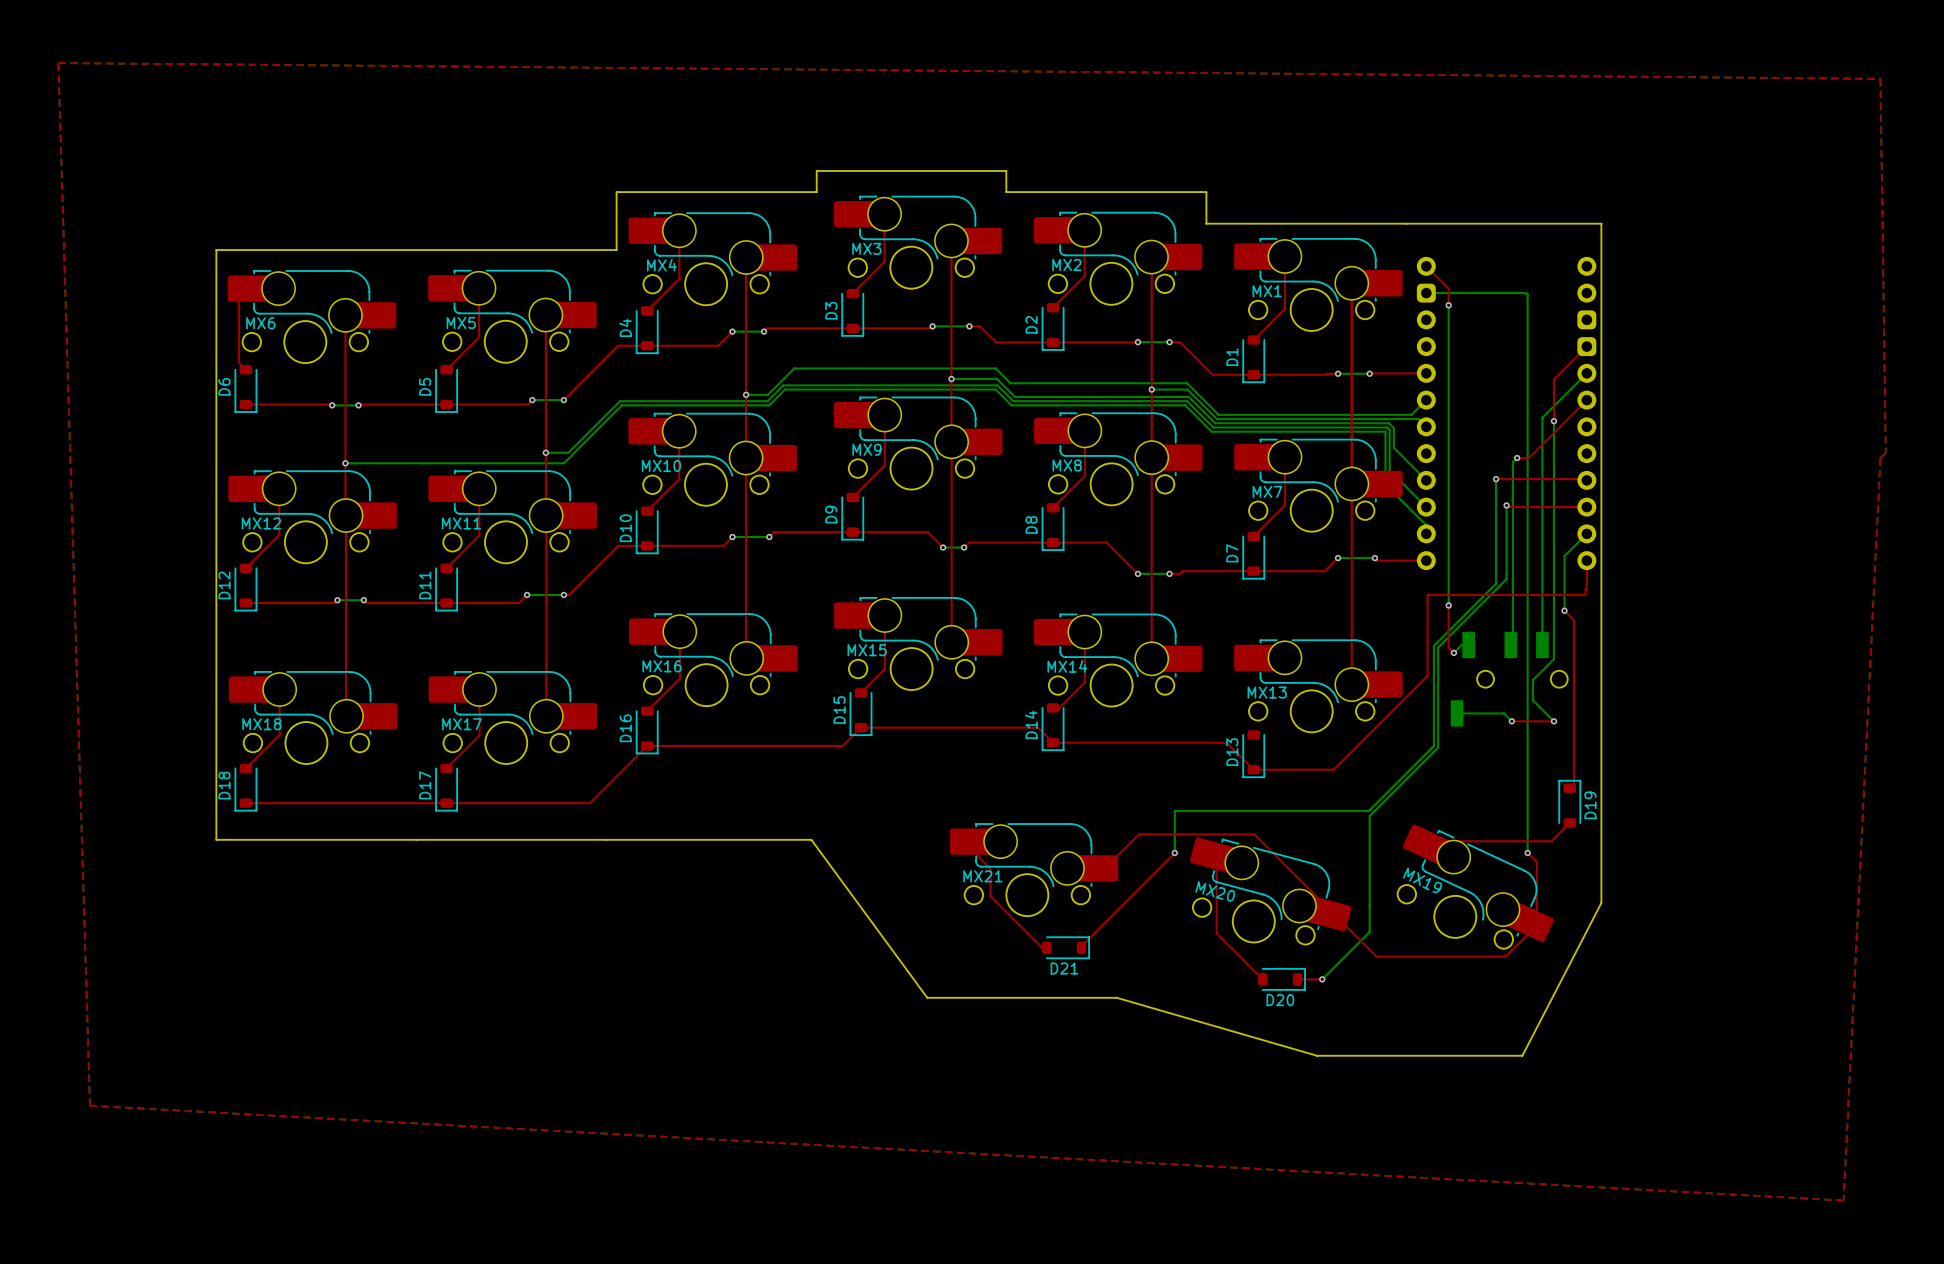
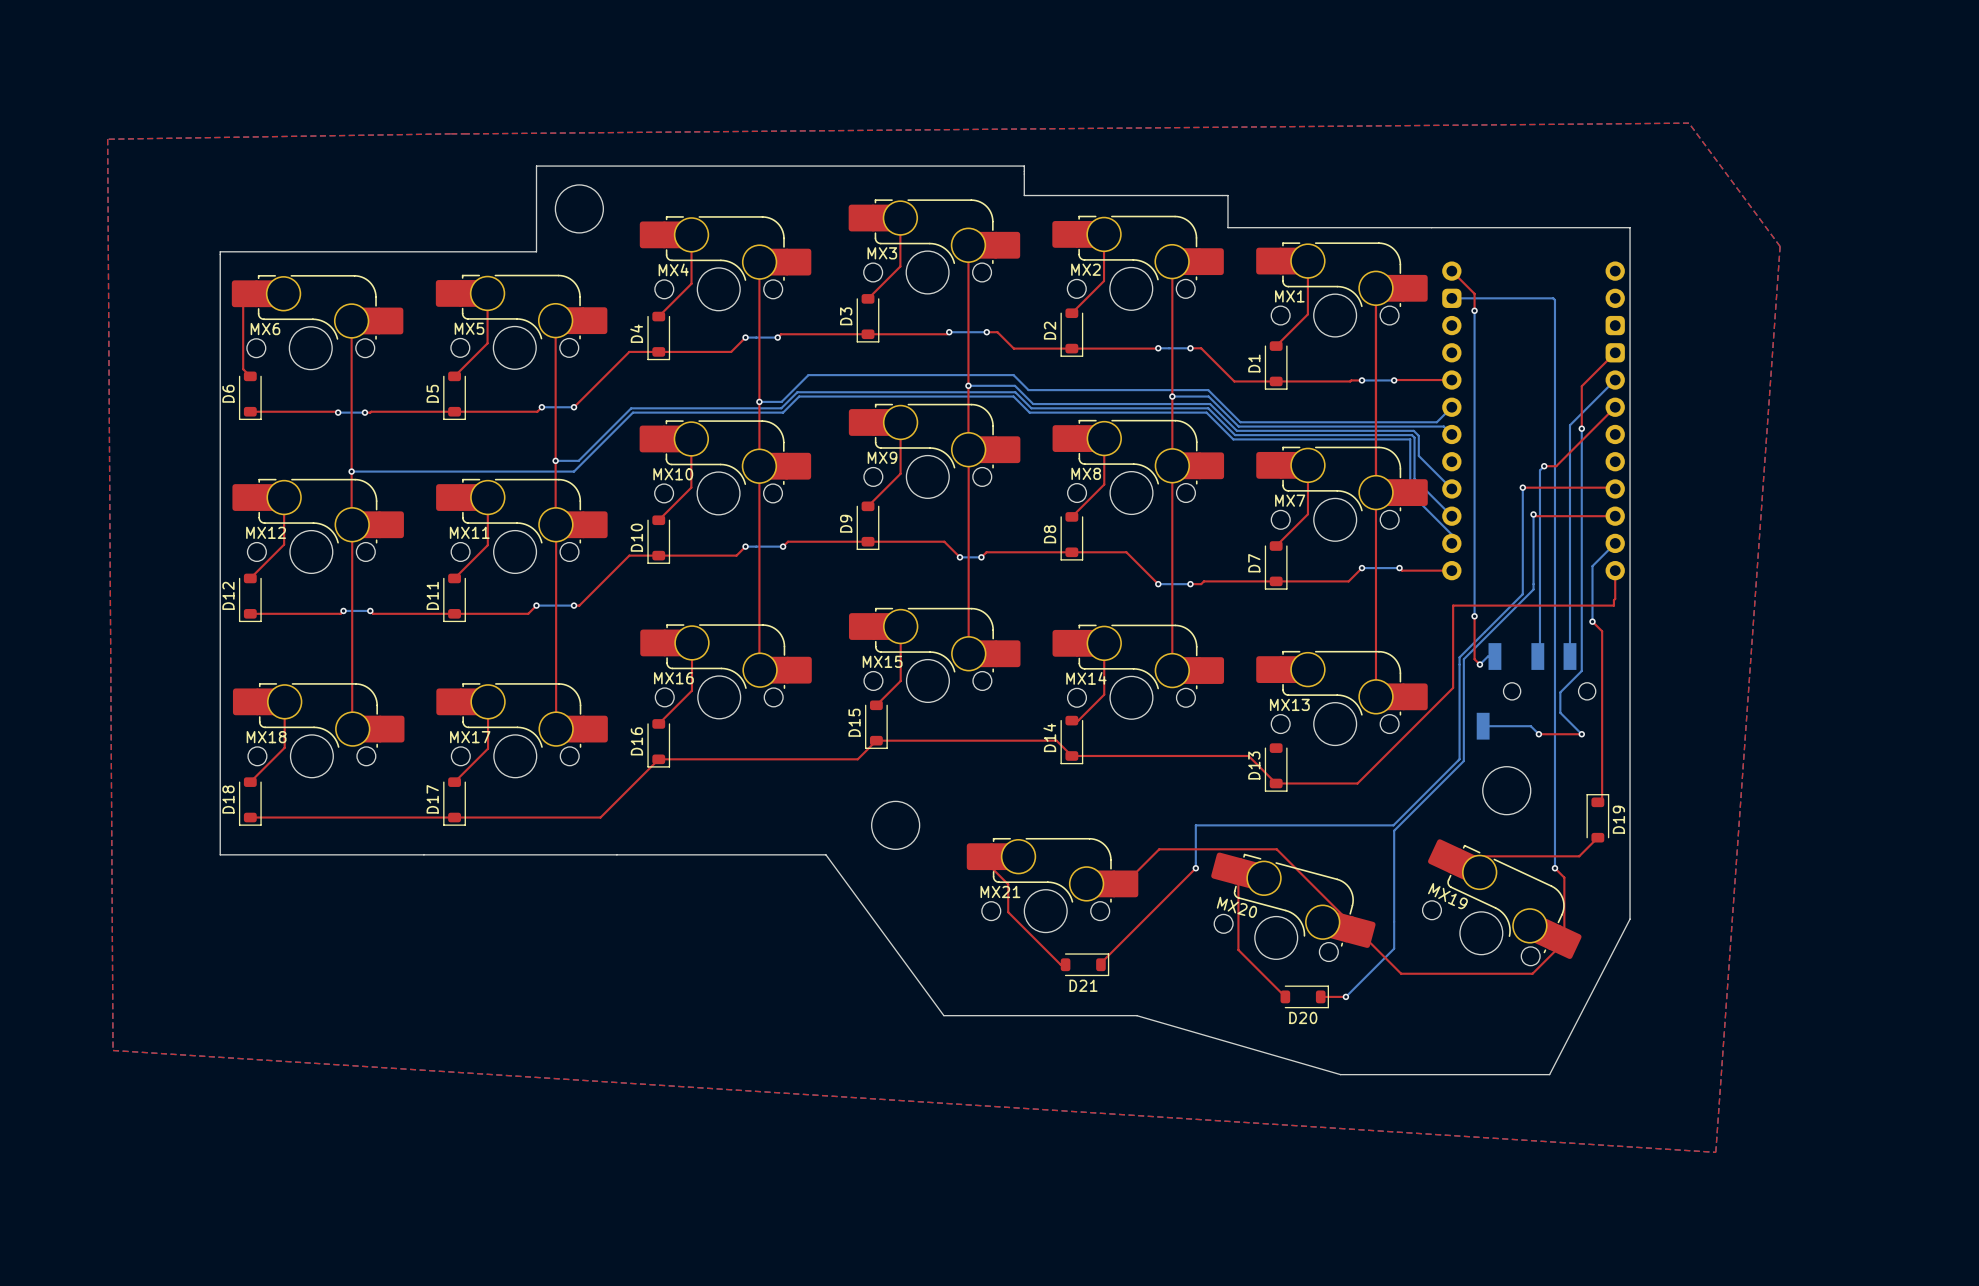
top zone outline: (58, 63) (89, 1105) (1843, 1200) (1880, 458) (1885, 452) (1880, 78) (58, 63) -> (1688, 123) (450, 133) (107, 139) (113, 1050) (1715, 1152) (1780, 246) (1688, 123)
board edge: (1006, 171) (816, 171) (816, 192) (616, 192) (616, 250) (216, 250) -> (1024, 174) (1024, 166) (536, 166) (536, 251) (220, 251) (220, 254)
round board edge: none -> [555, 184, 604, 234]
round board edge: none -> [1482, 766, 1531, 815]
round board edge: none -> [871, 801, 920, 850]

